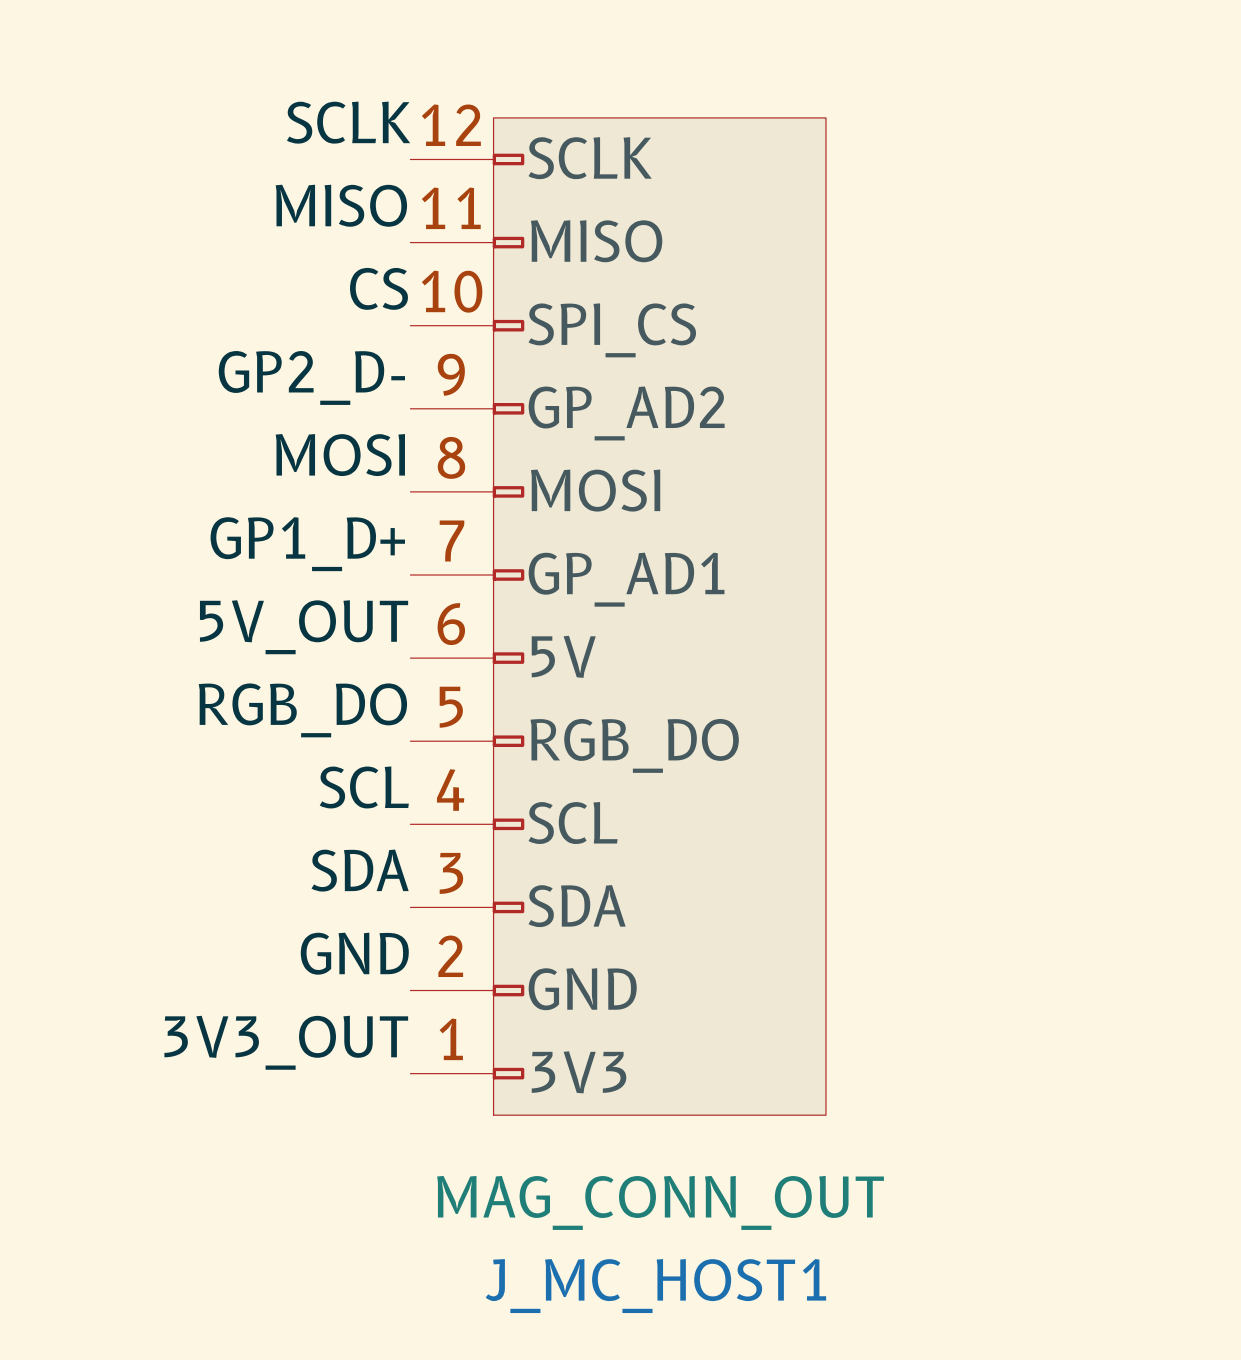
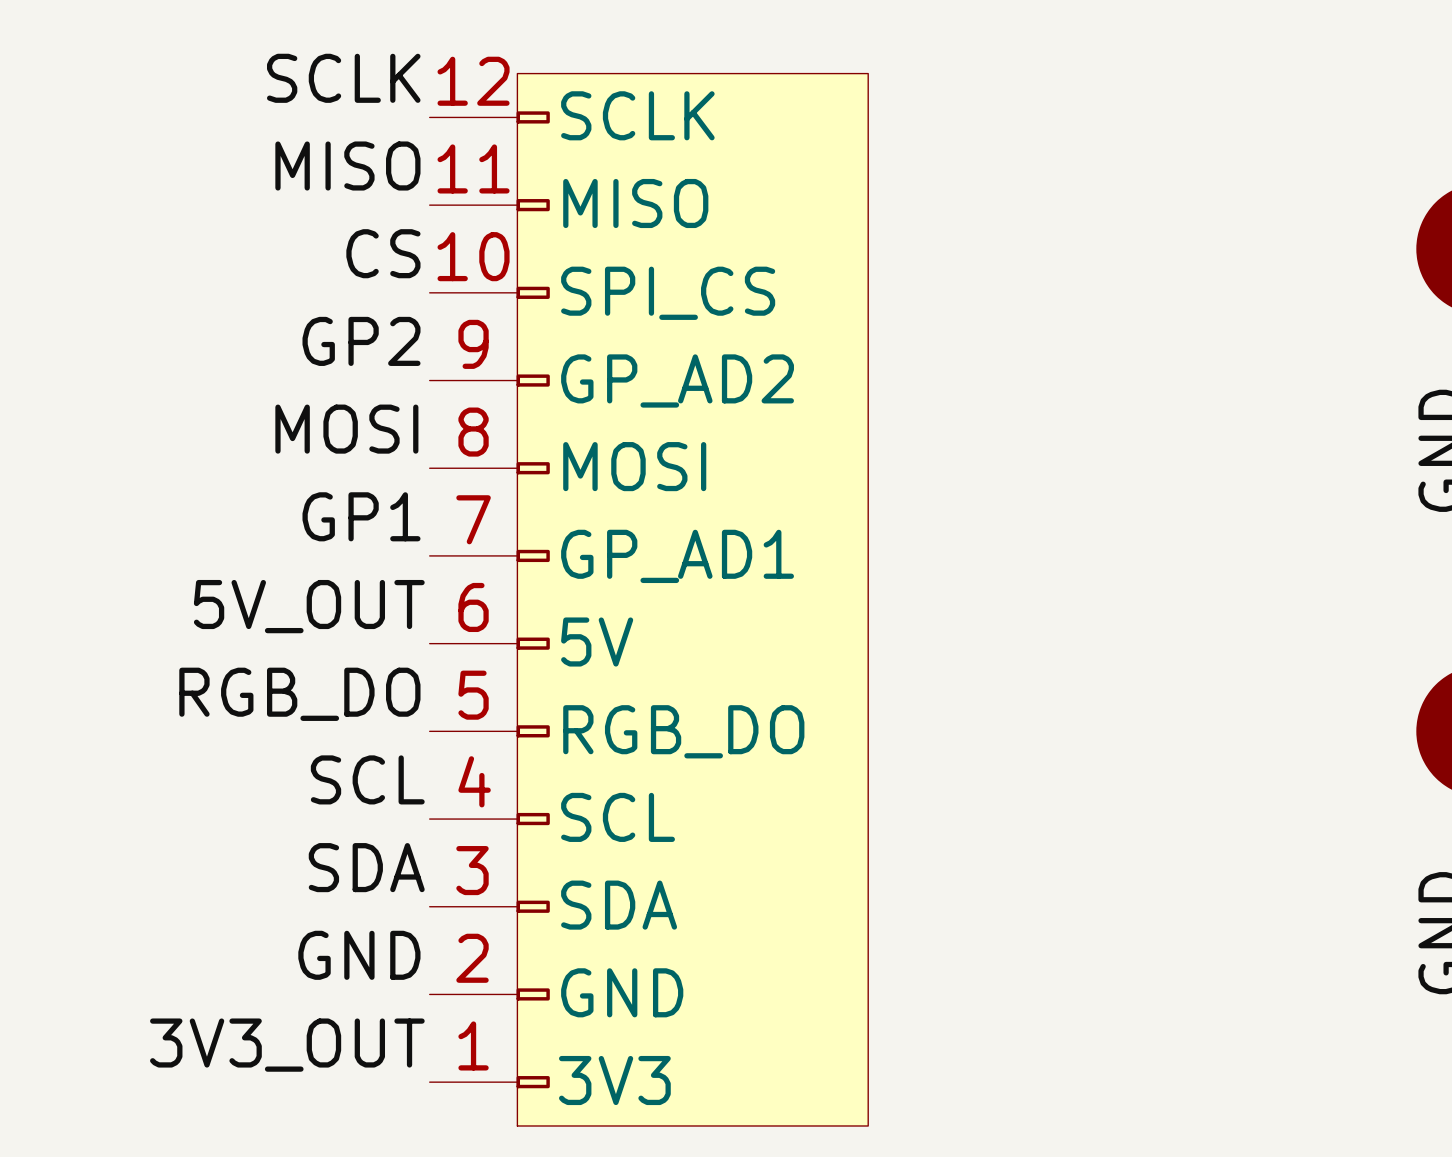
label: GP2_D- (311, 377) -> GP2 (361, 341)
label: GP1_D+ (307, 544) -> GP1 (361, 516)

